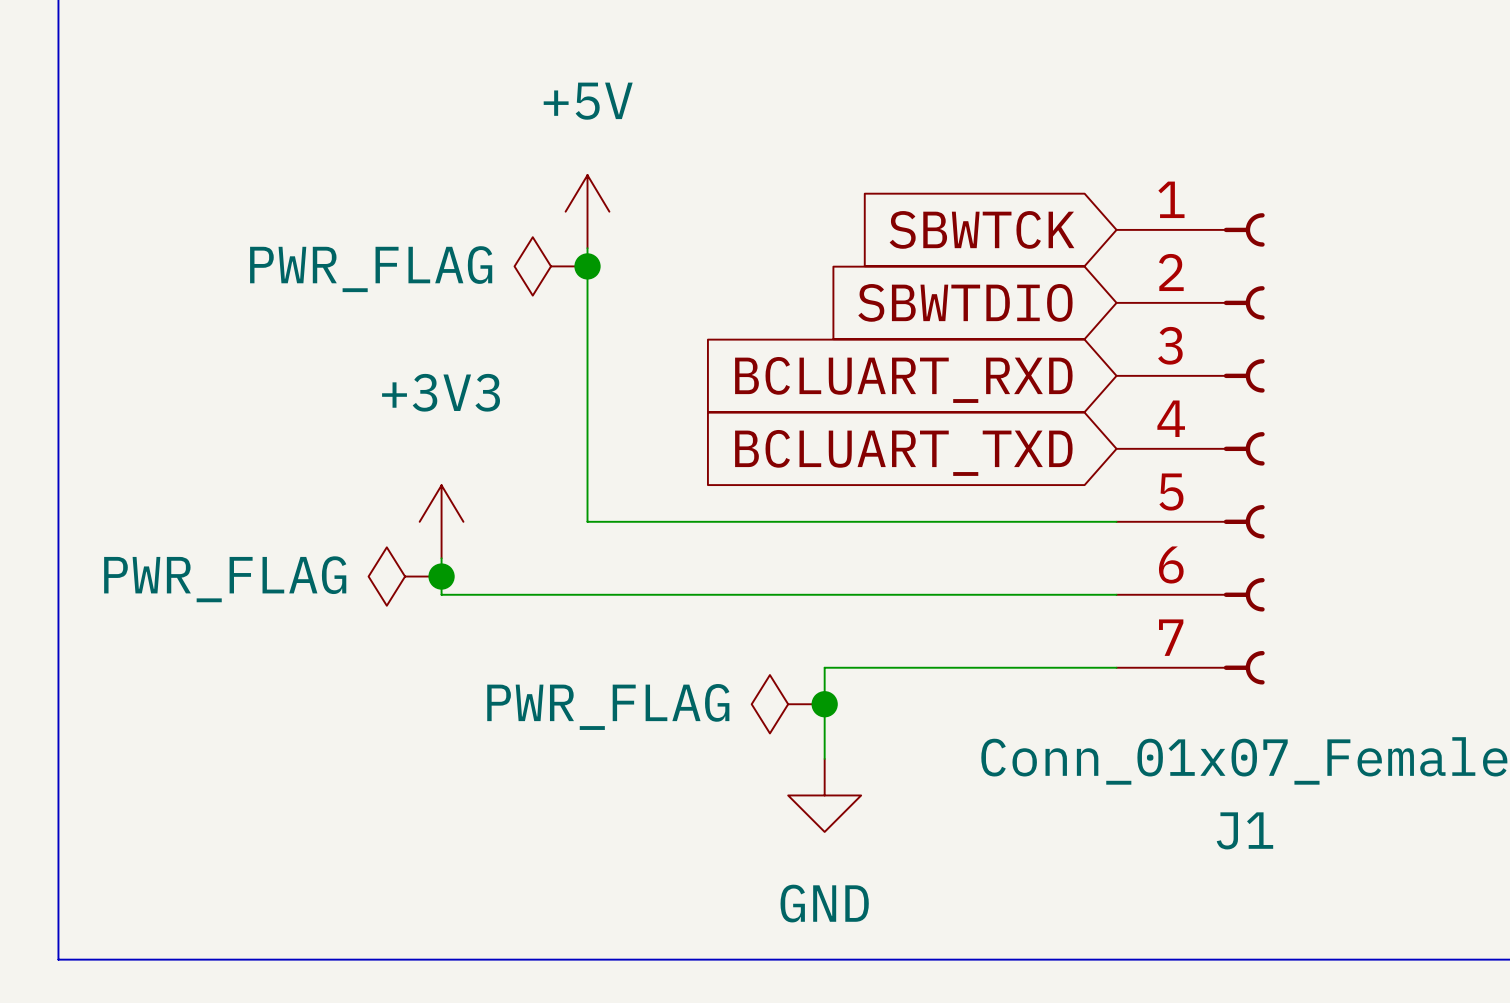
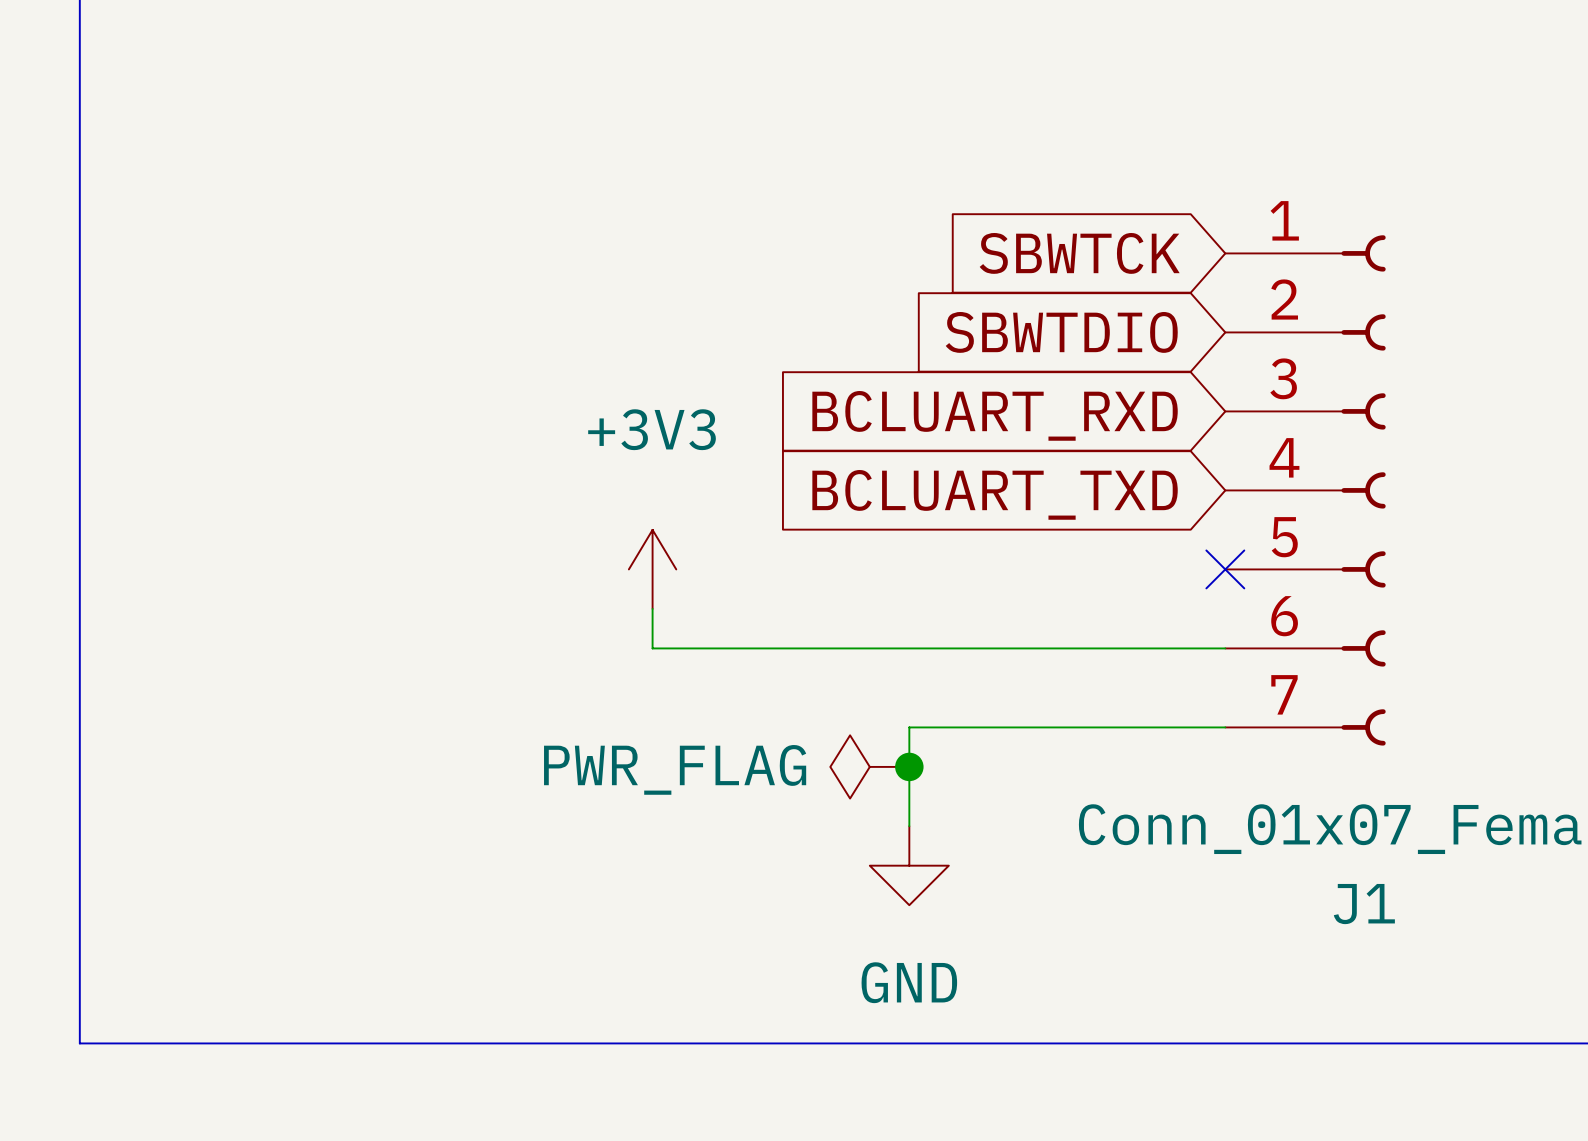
power symbol: +5V (587, 211) -> none
wire: (587, 248) (587, 521) (1116, 521) -> none
power symbol: PWR_FLAG (551, 266) -> none
junction: (587, 266) -> none
power symbol position: +3V3 (441, 521) -> +3V3 (652, 569)
no-connect mark: none -> (1225, 569)
wire: (441, 558) (441, 594) (587, 594) -> (652, 608) (652, 648)
power symbol: PWR_FLAG (405, 576) -> none
junction: (441, 576) -> none

